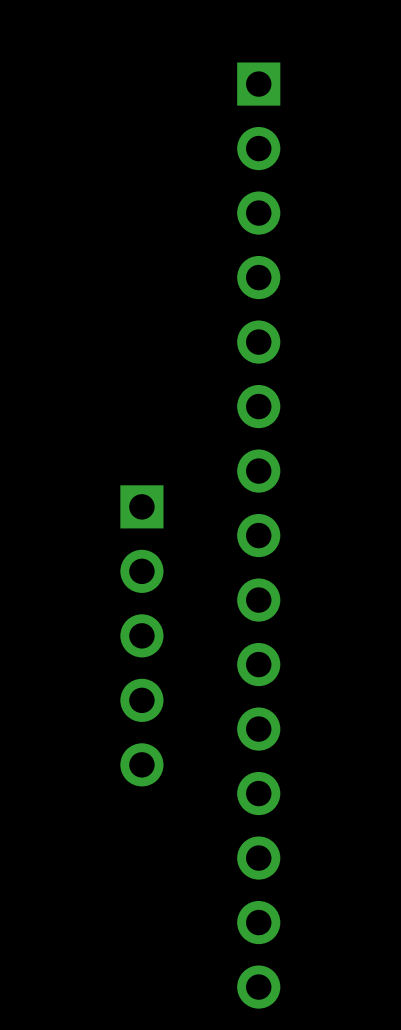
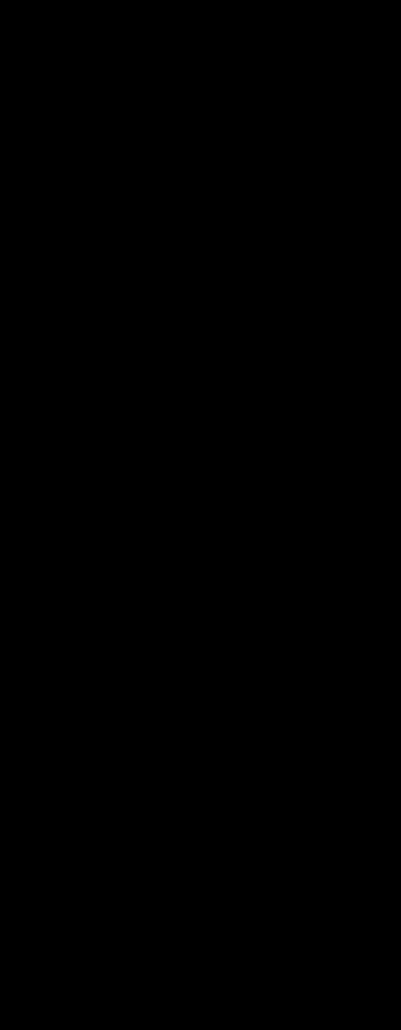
part: (258, 535) -> none
part: (141, 635) -> none

